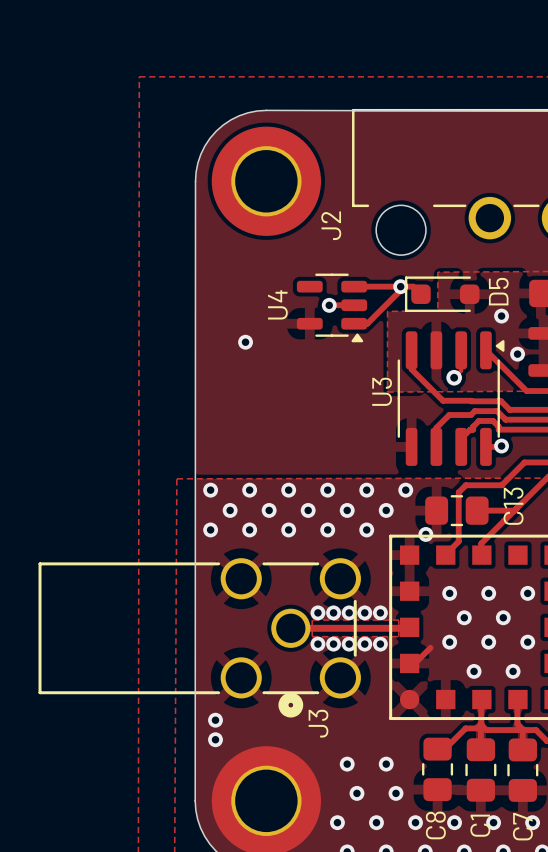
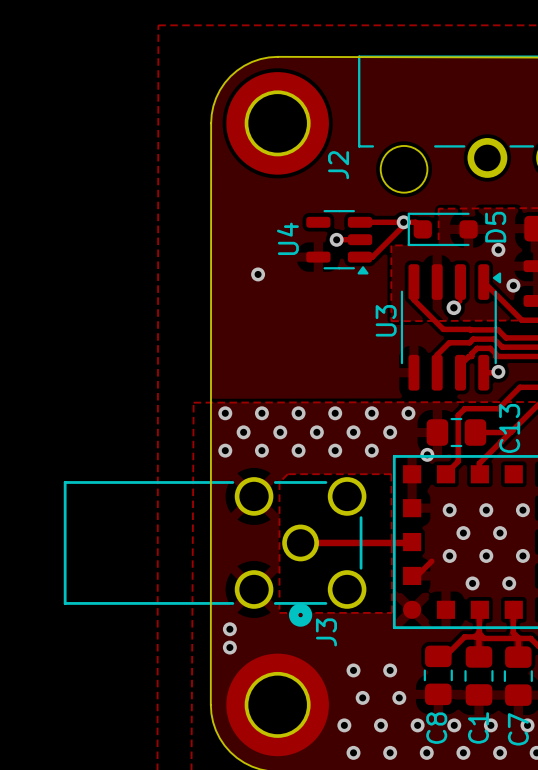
zone outline: none -> (287, 474) (279, 482) (279, 612) (392, 612) (391, 474) (287, 474)
via: (317, 612) -> none
via: (333, 612) -> none
via: (349, 612) -> none
via: (364, 612) -> none
via: (380, 612) -> none
zone outline: (312, 620) (312, 636) (398, 636) (398, 620) (312, 620) -> none
via: (317, 644) -> none
via: (333, 644) -> none
via: (349, 644) -> none
via: (364, 644) -> none
via: (380, 644) -> none

